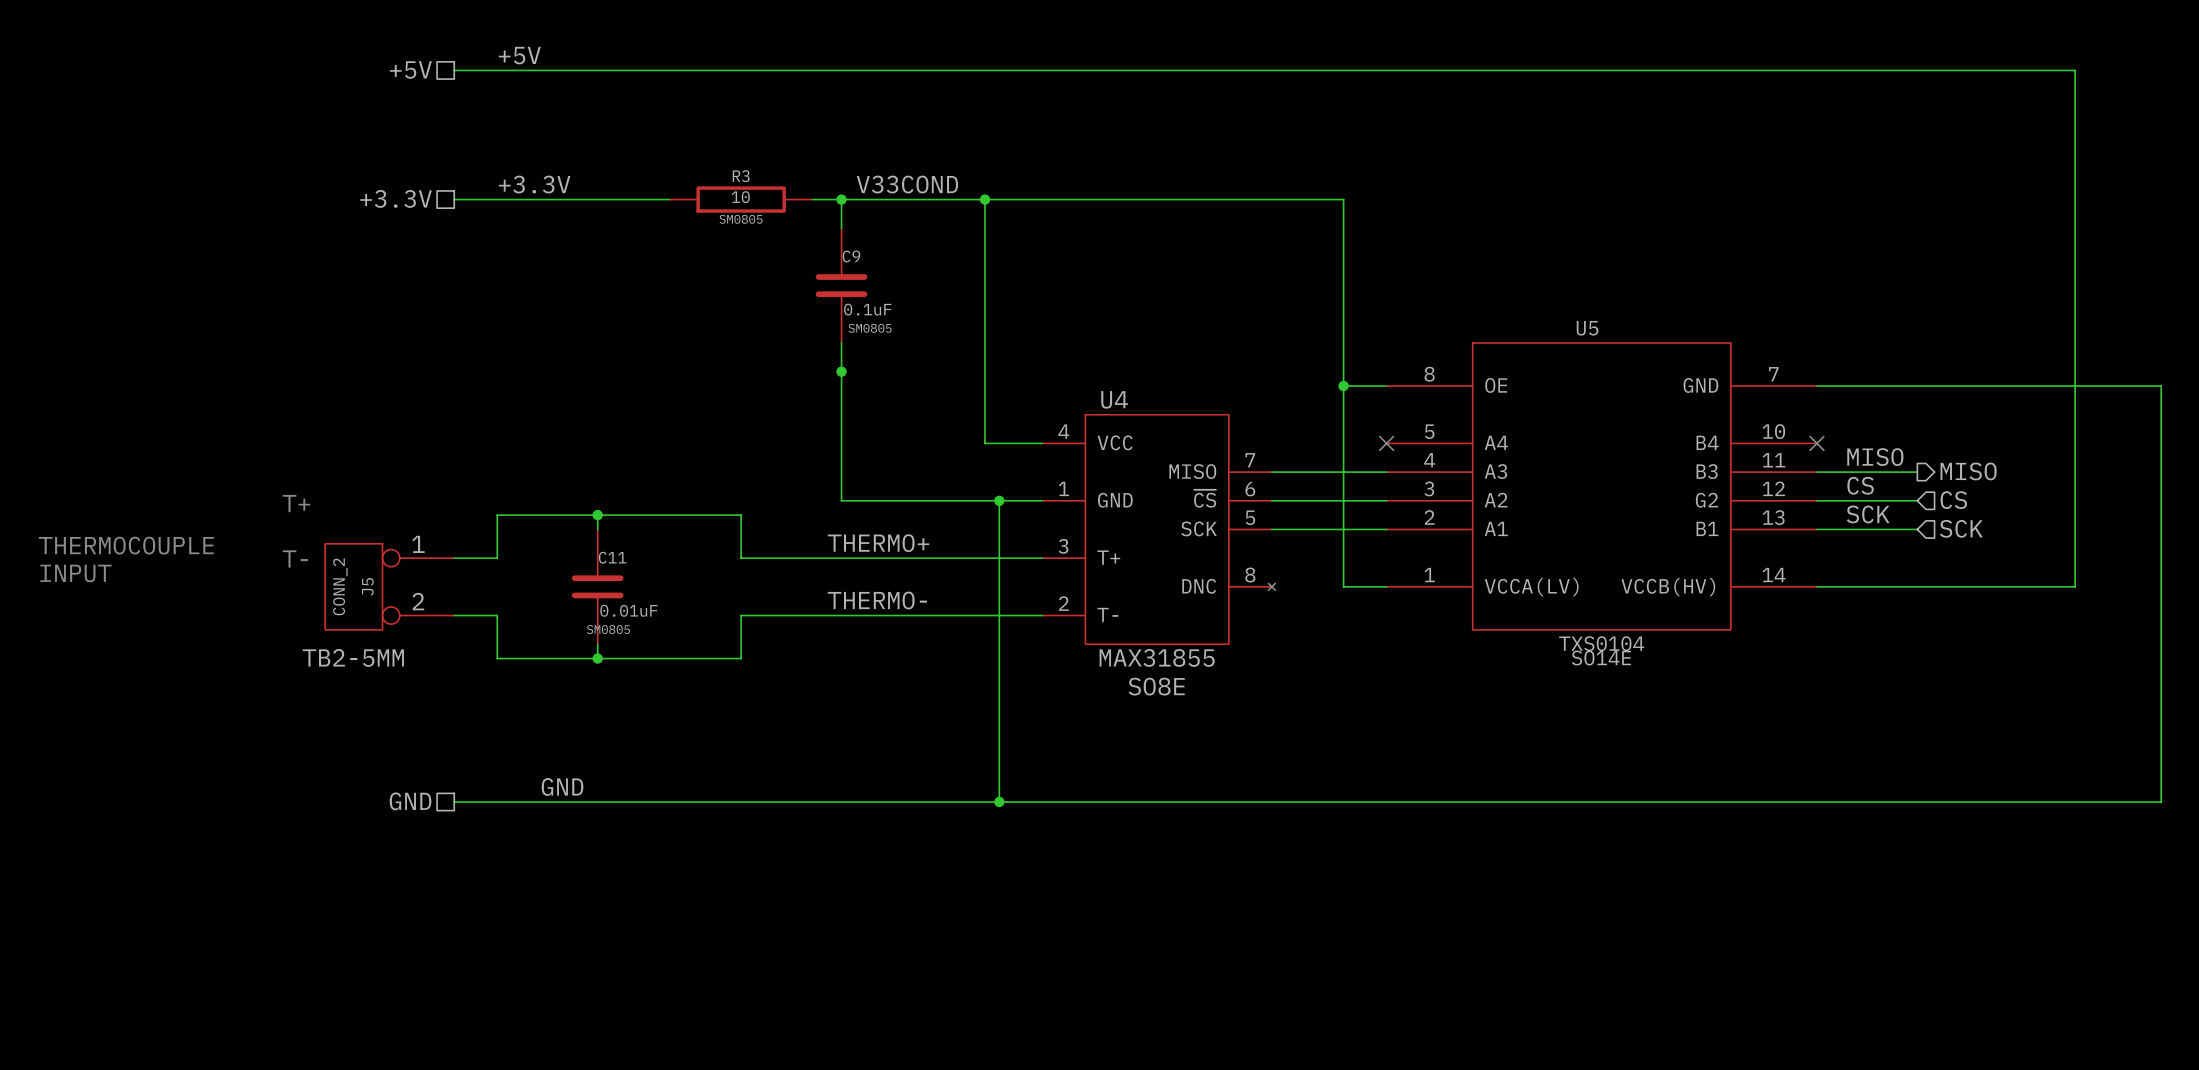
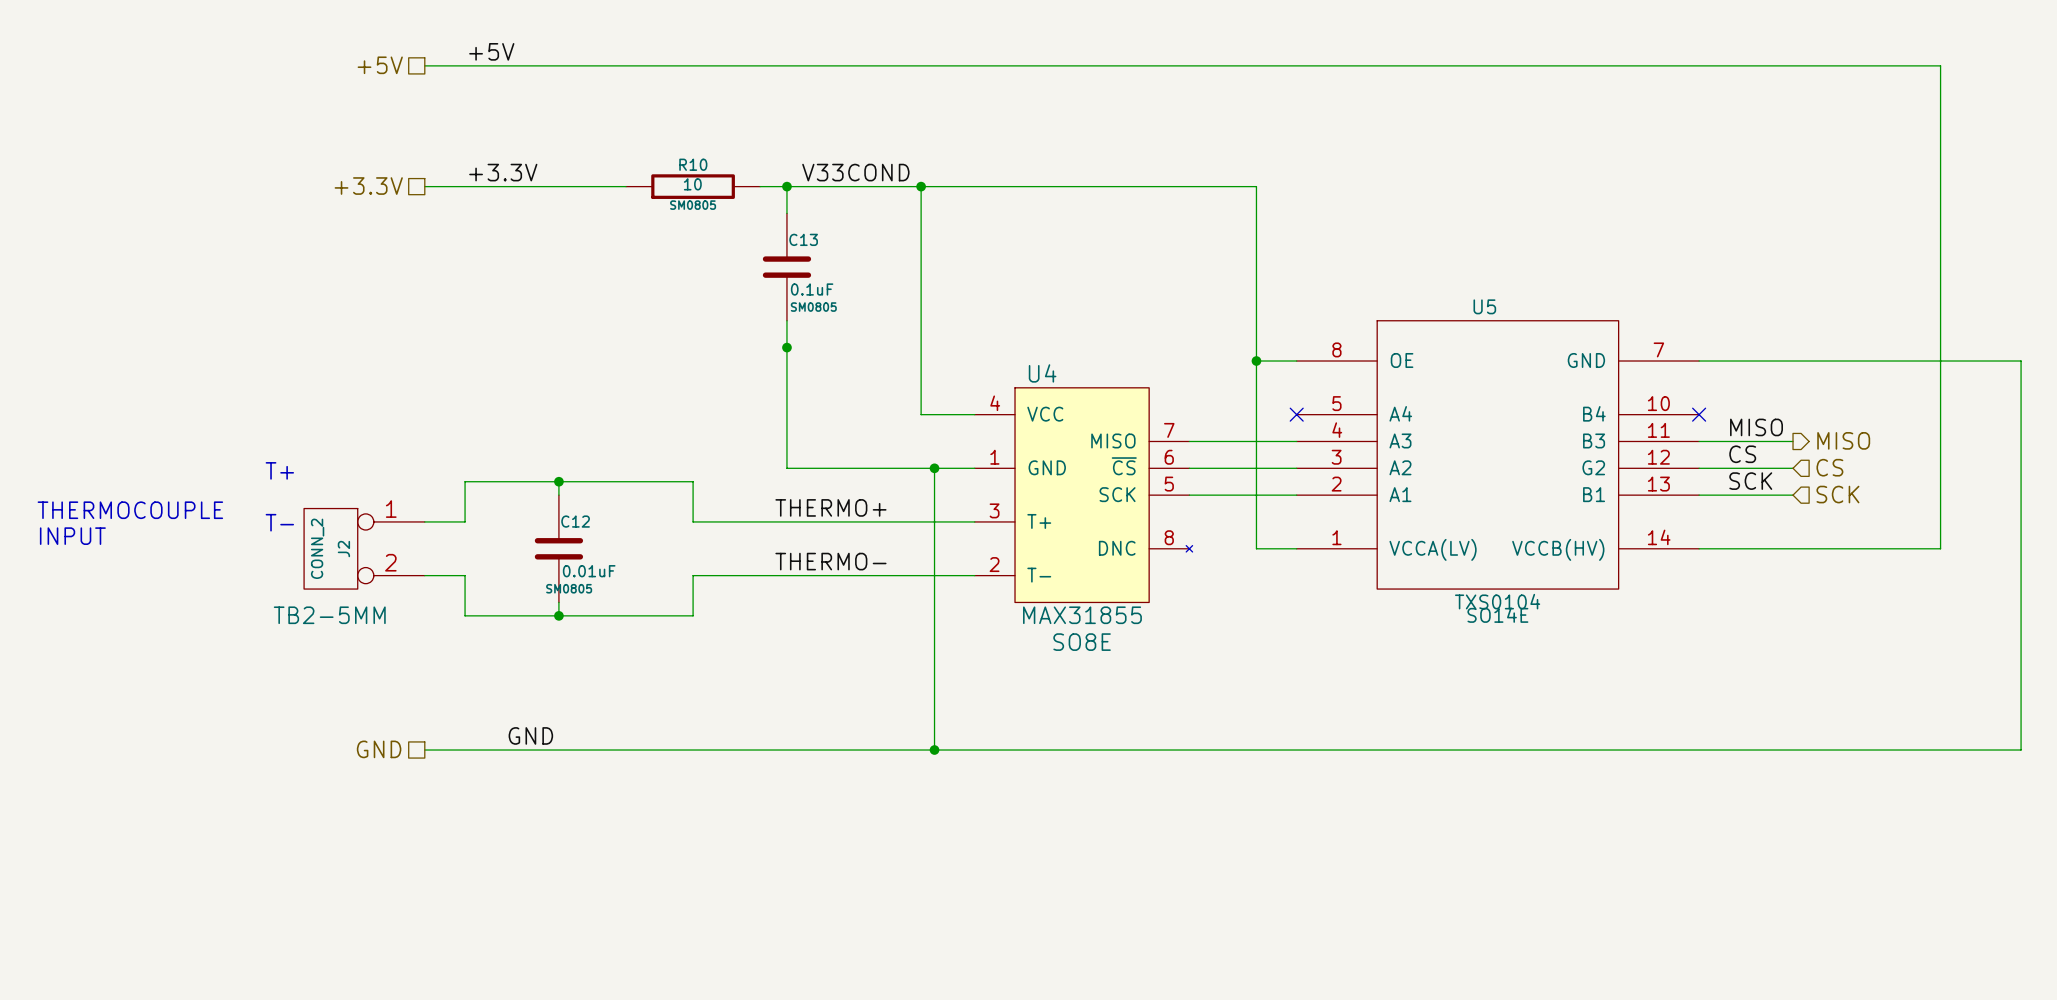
R3 name: R3 (741, 176) -> R10 (693, 164)
C9 name: C9 (851, 256) -> C13 (803, 239)
C11 name: C11 (612, 557) -> C12 (575, 521)
J5 name: J5 (367, 586) -> J2 (343, 549)

